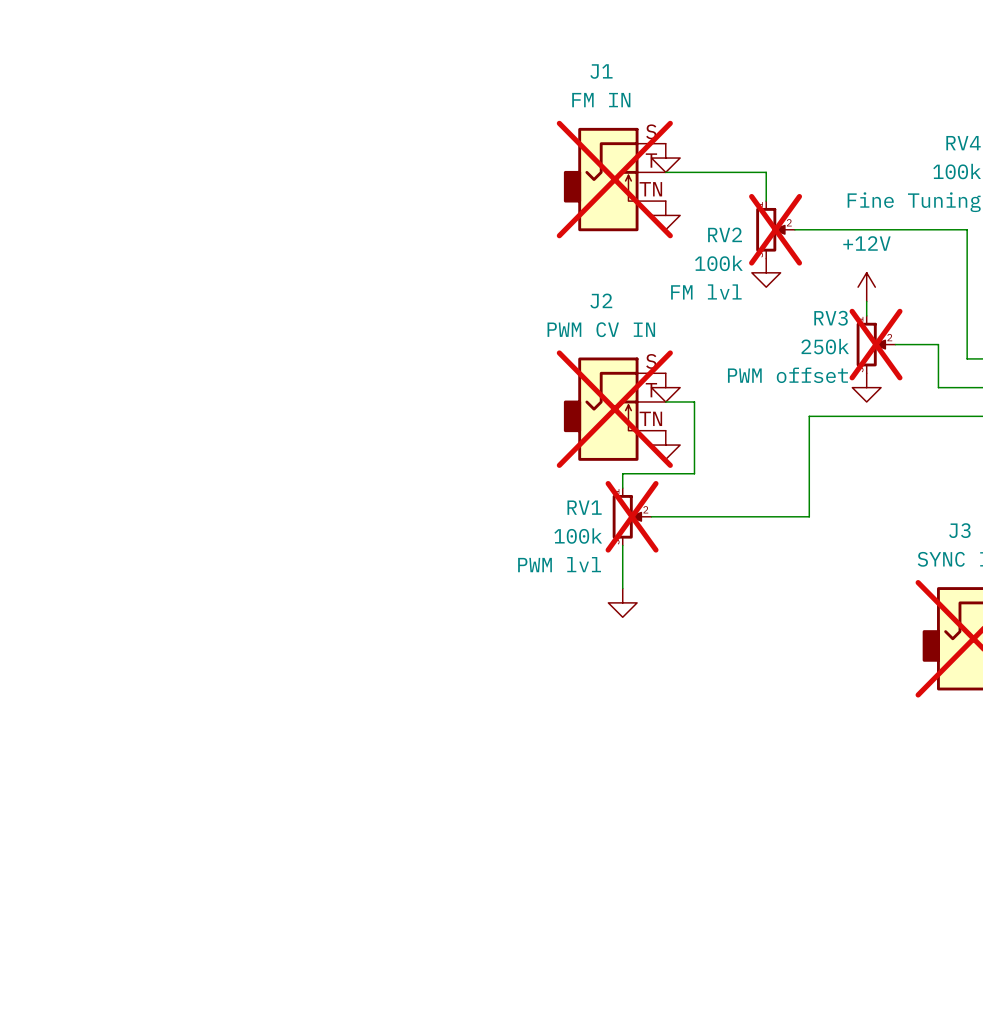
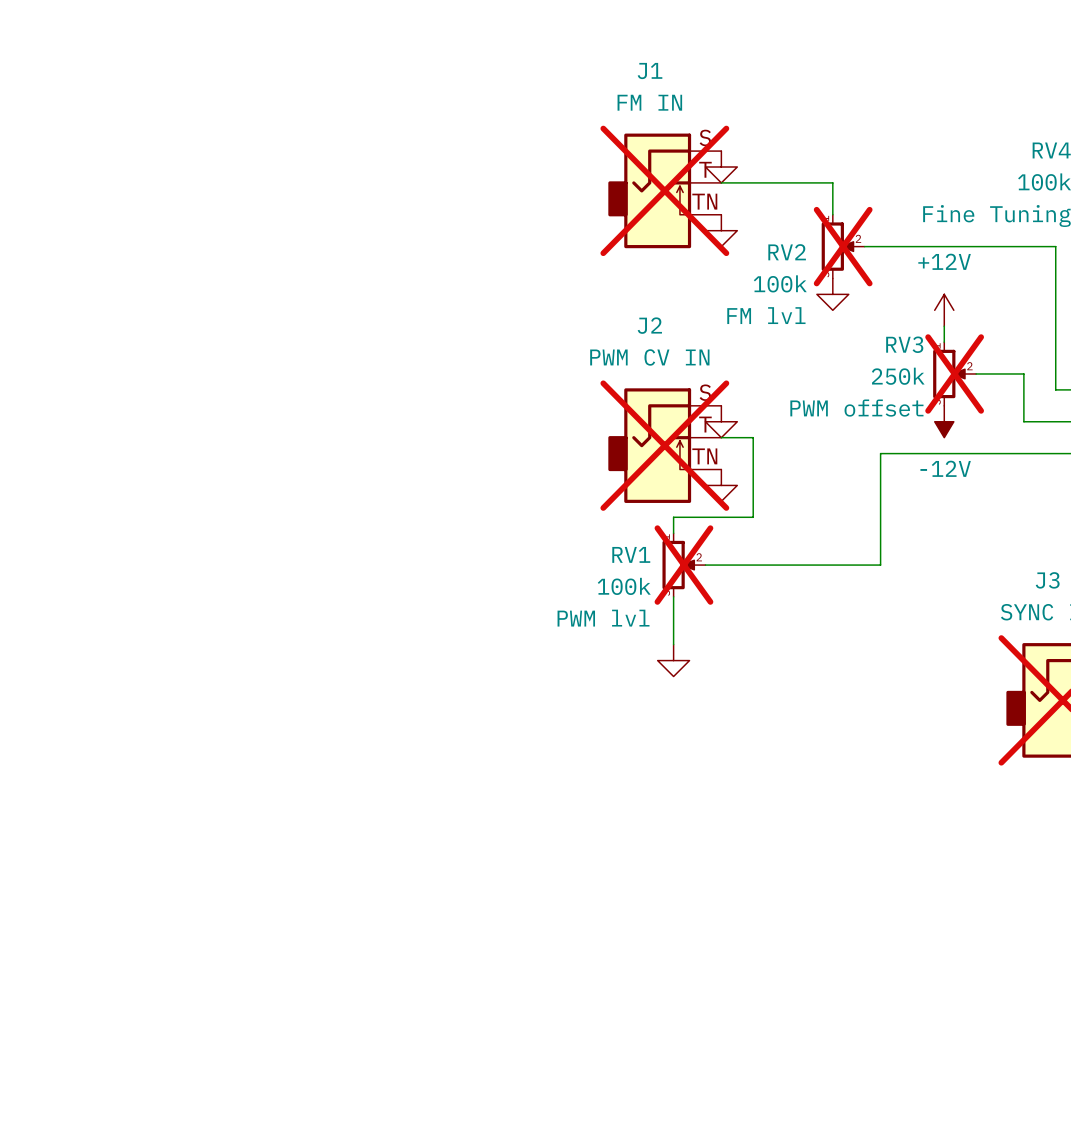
power symbol shape: [852, 373, 882, 402] -> [934, 405, 954, 438]
power symbol text: none -> -12V (945, 468)

